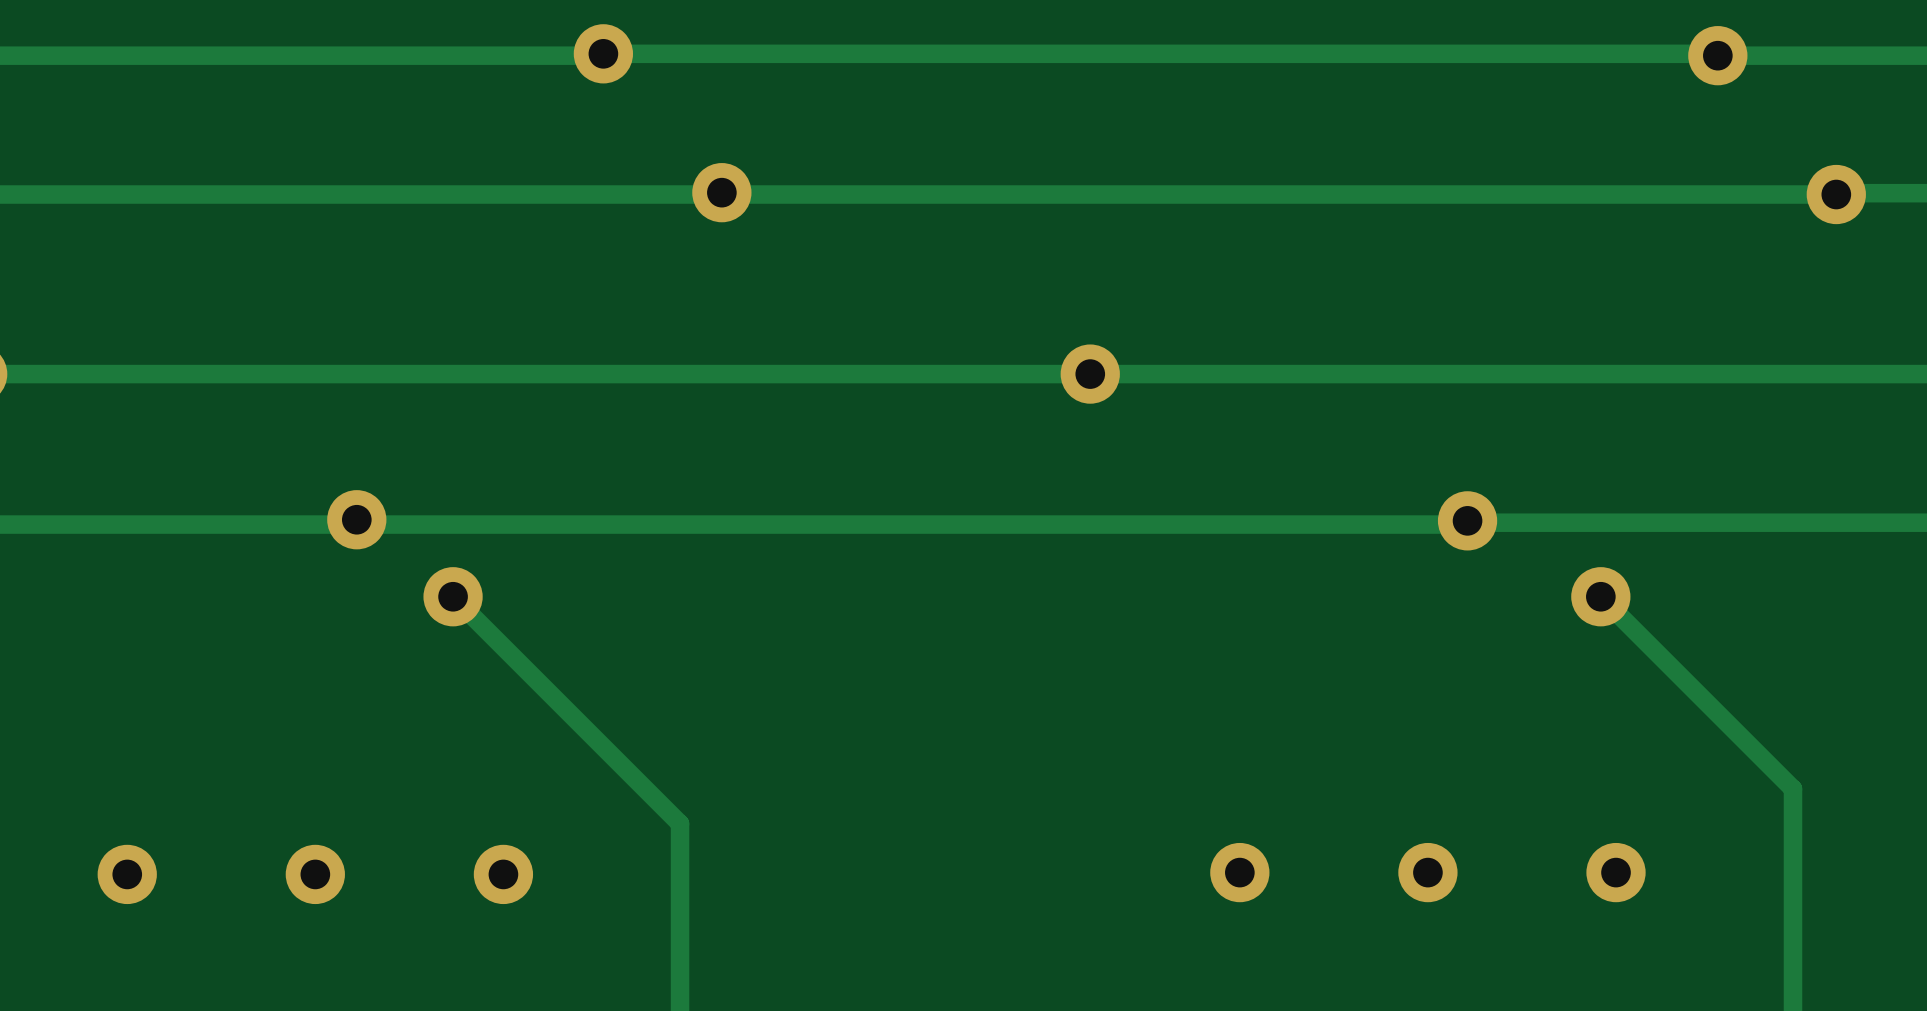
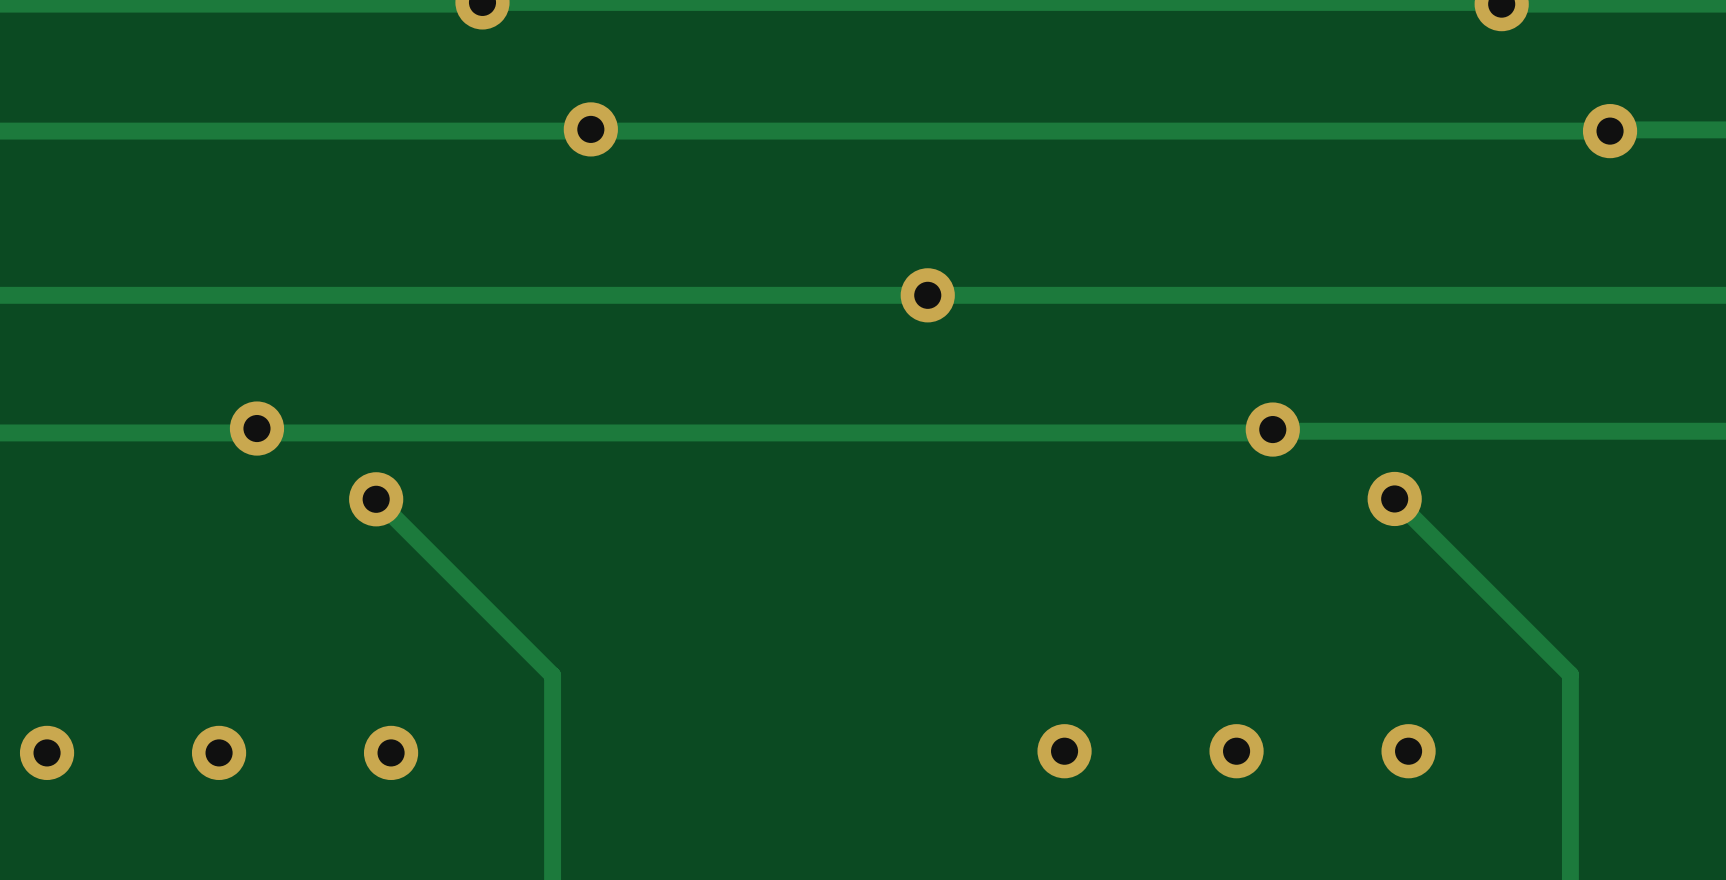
track: (453, 596) (680, 823) -> (376, 499) (552, 675) (552, 706)
via position: (453, 596) -> (376, 499)

